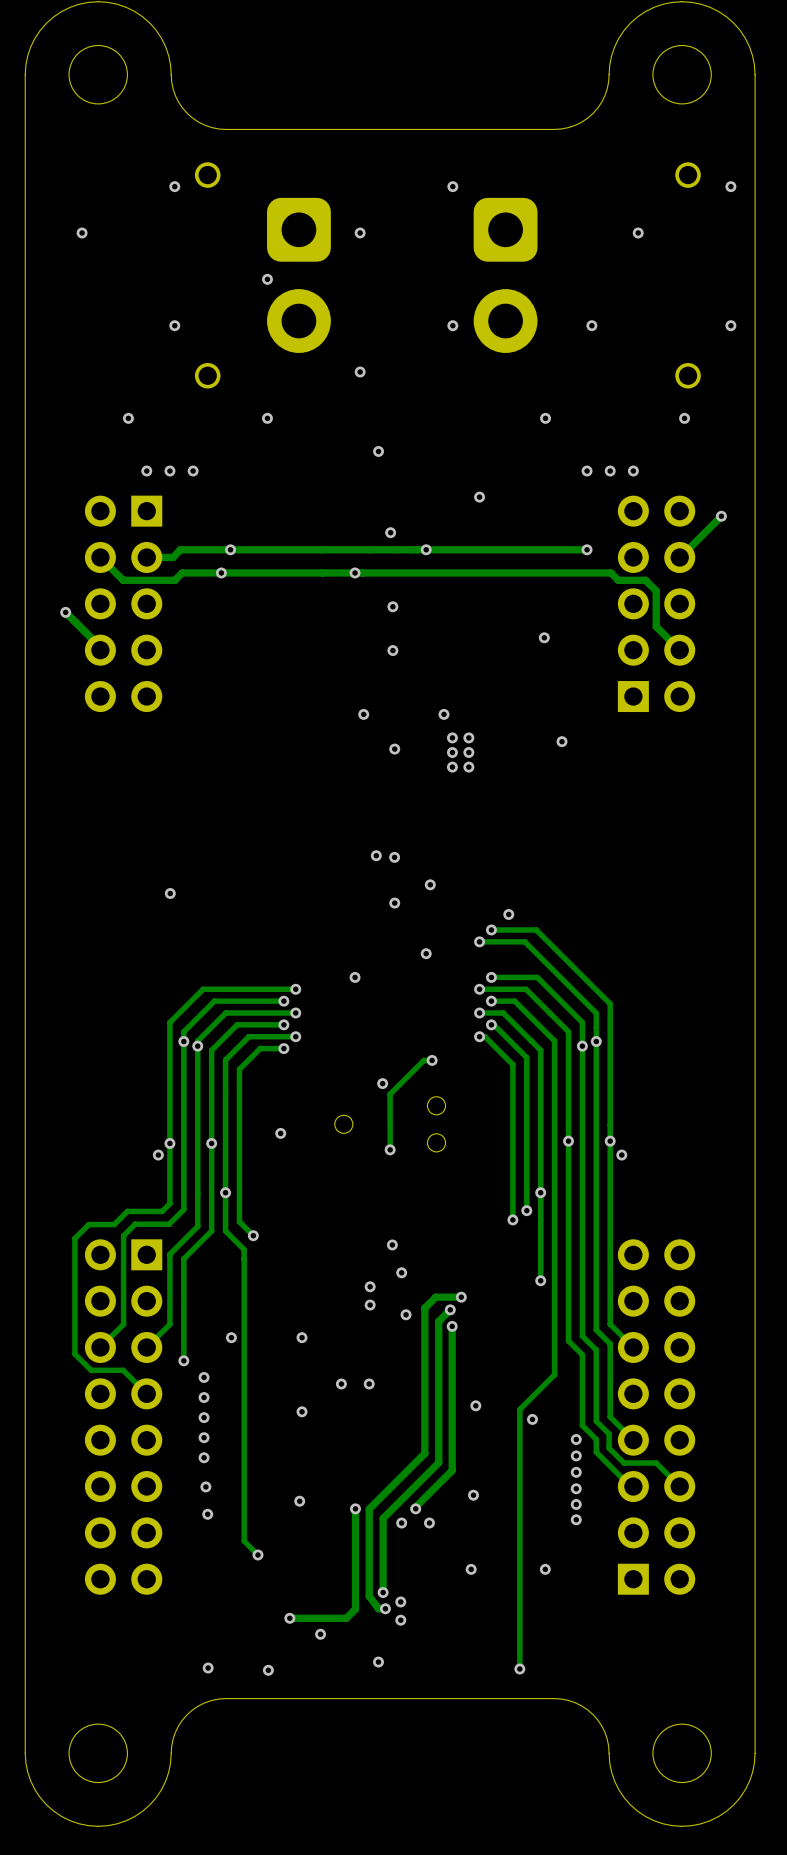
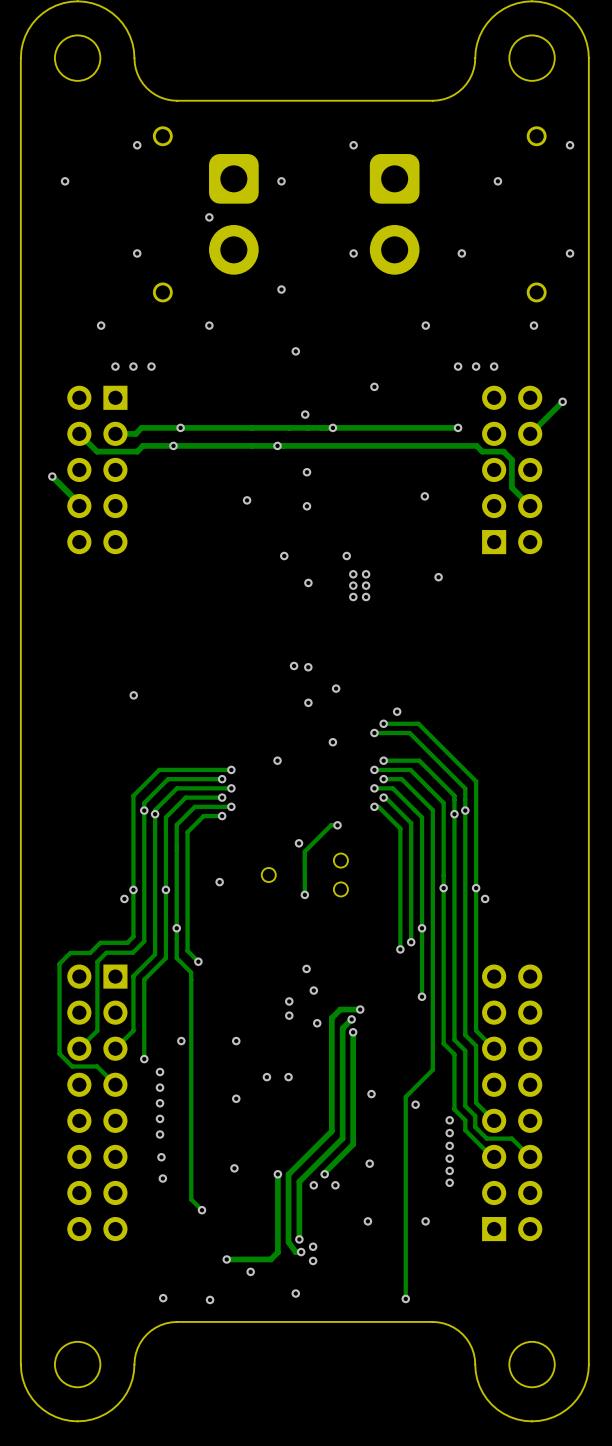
via: none -> (247, 500)

